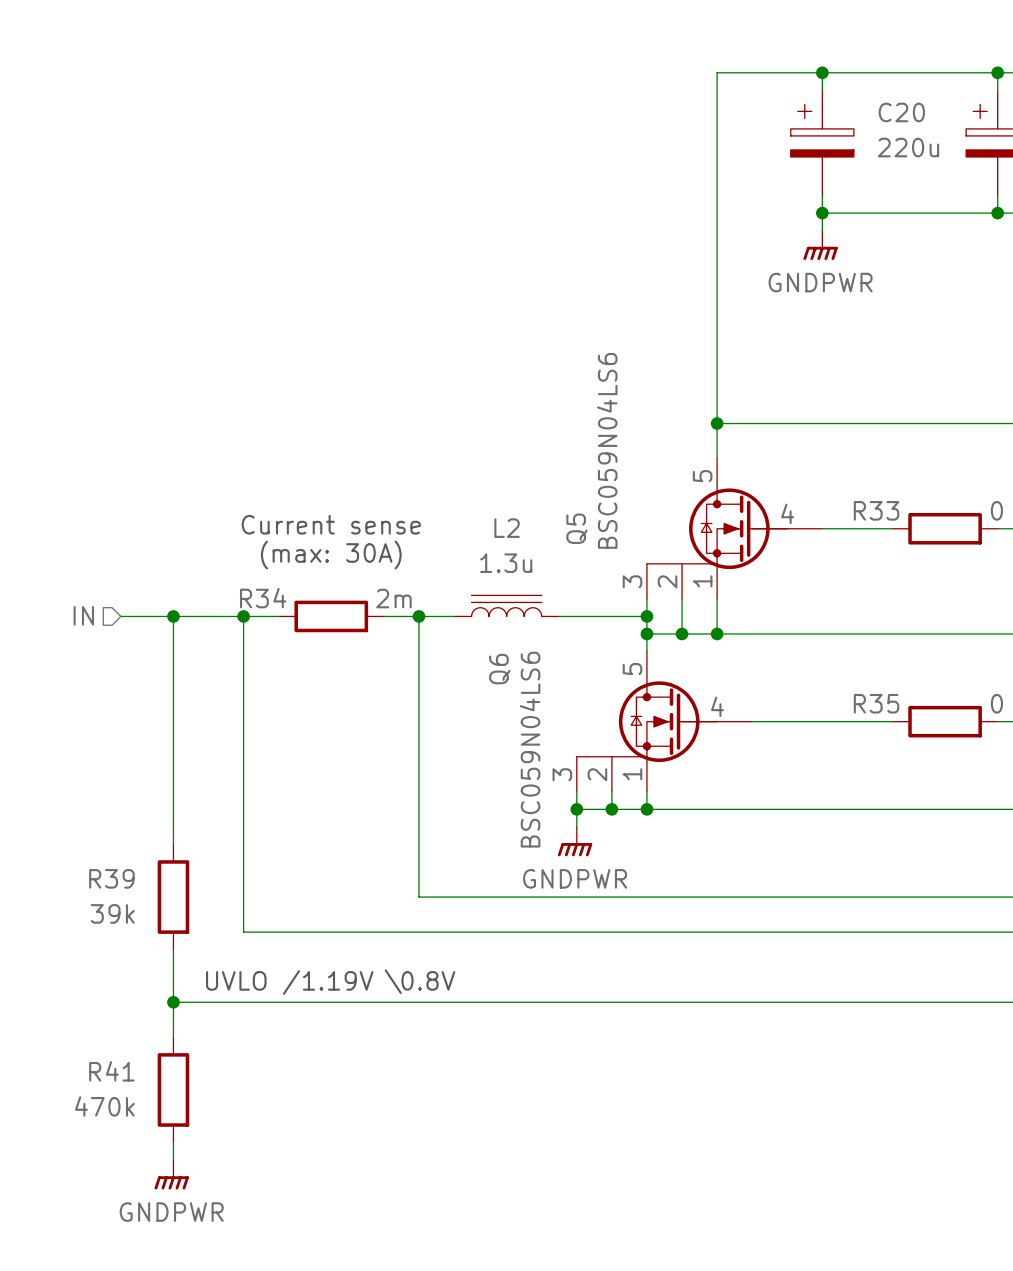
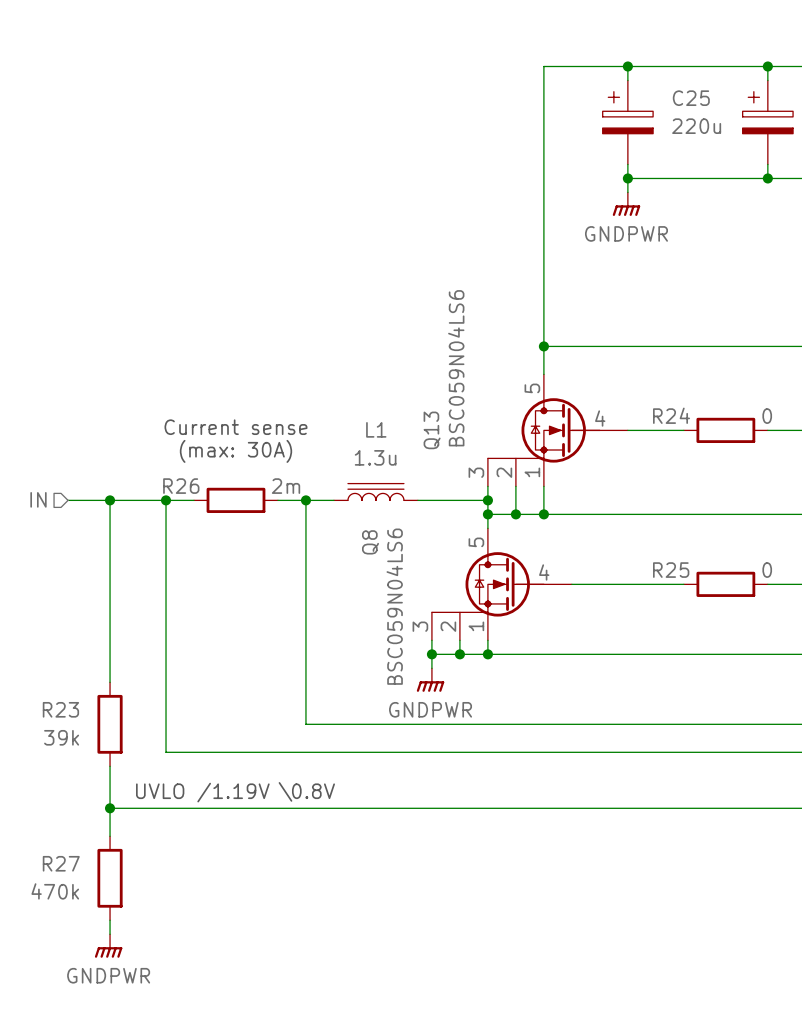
C20 name: C20 (901, 112) -> C25 (691, 98)
R33 name: R33 (876, 510) -> R24 (671, 415)
L2 name: L2 (507, 528) -> L1 (376, 429)
Q5 name: Q5 (576, 528) -> Q13 (432, 430)
R34 name: R34 (263, 598) -> R26 (181, 486)
Q6 name: Q6 (499, 669) -> Q8 (370, 542)
R35 name: R35 (876, 703) -> R25 (671, 570)
R39 name: R39 (111, 878) -> R23 (60, 709)
R41 name: R41 (111, 1071) -> R27 (61, 863)

